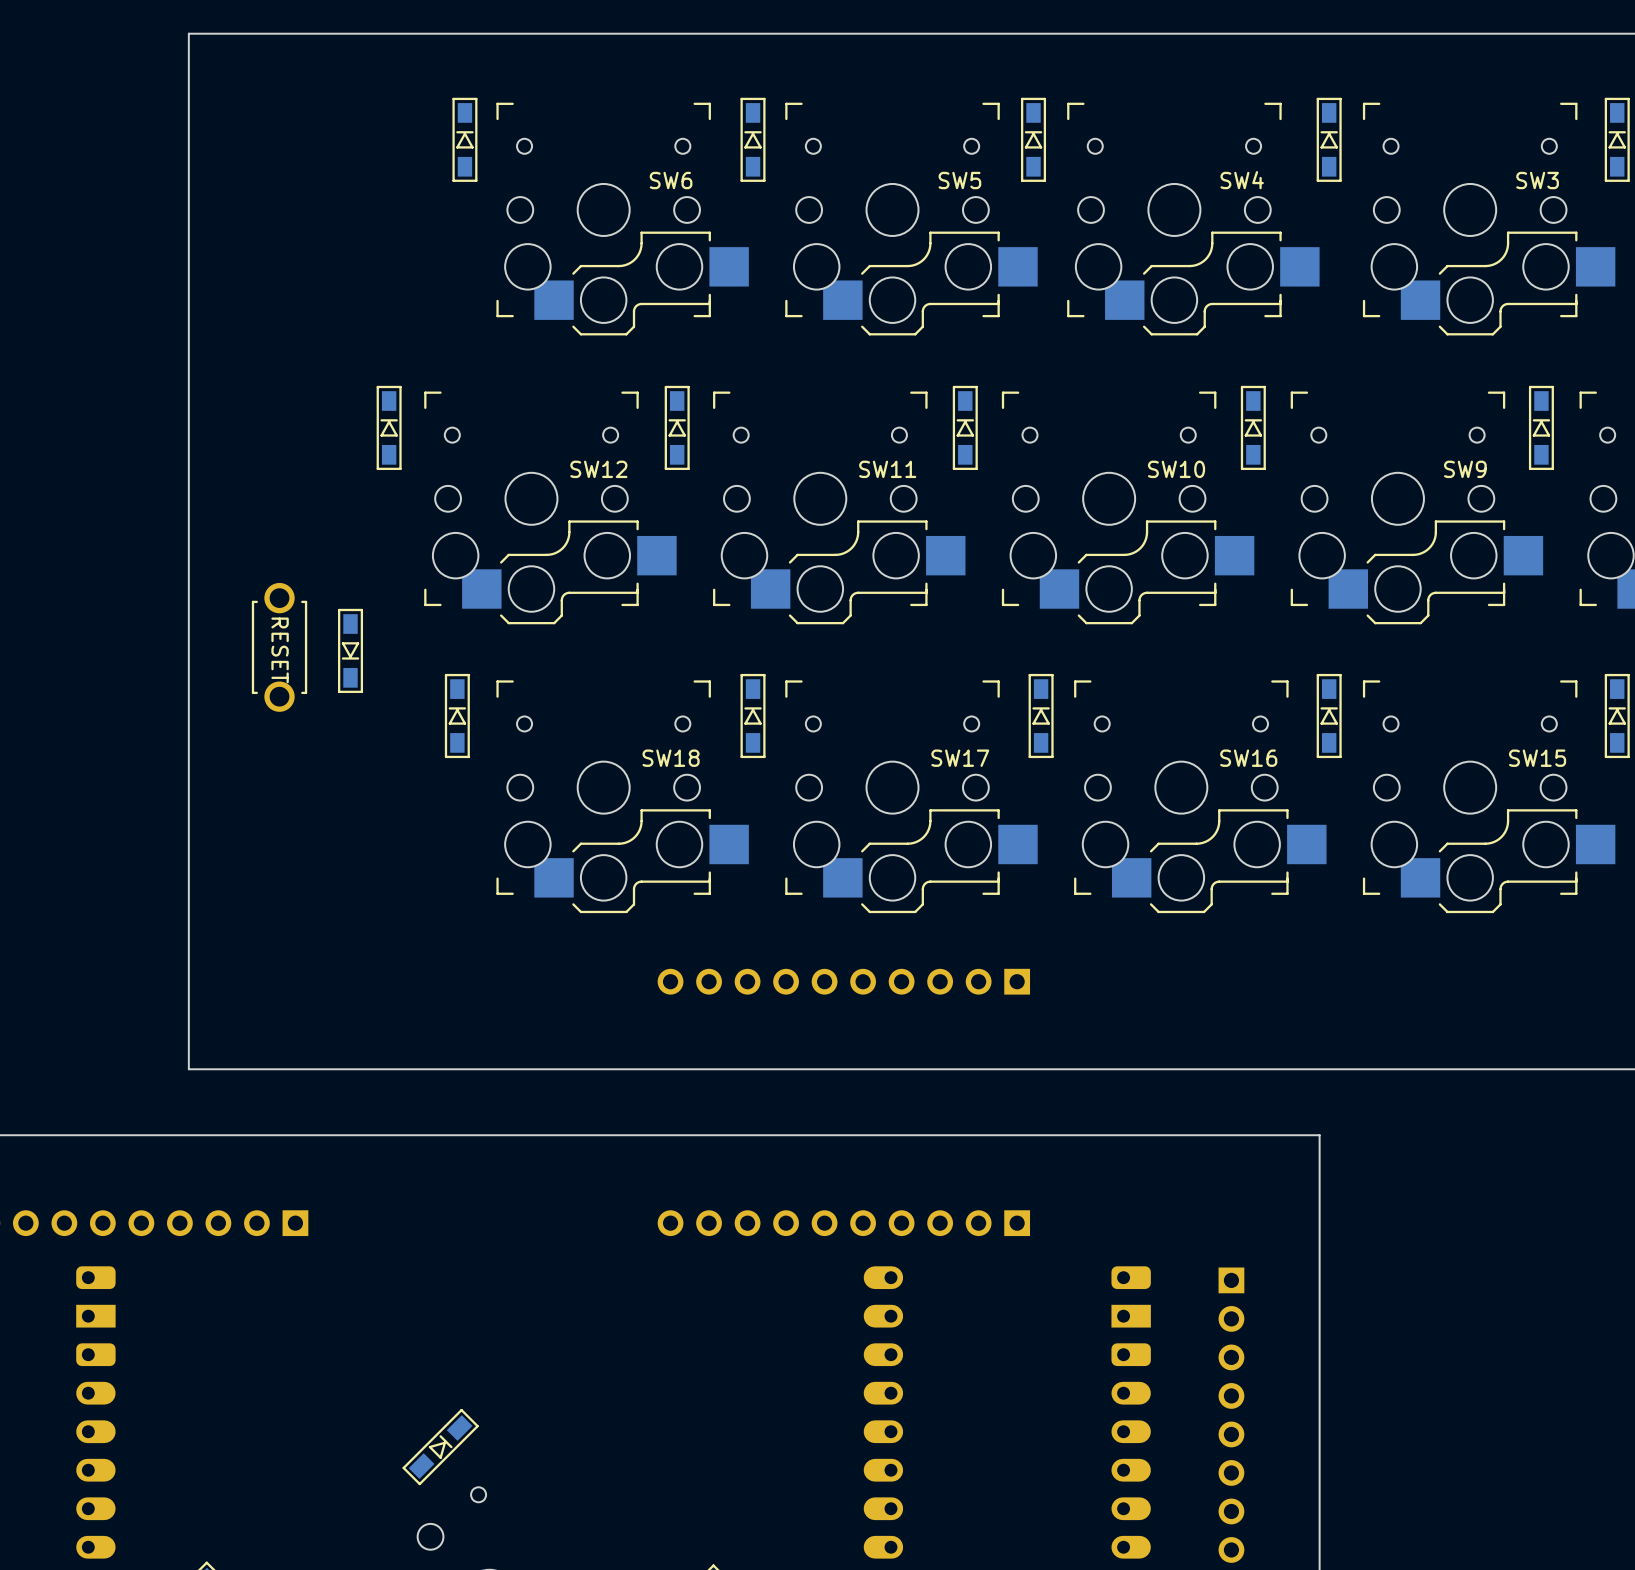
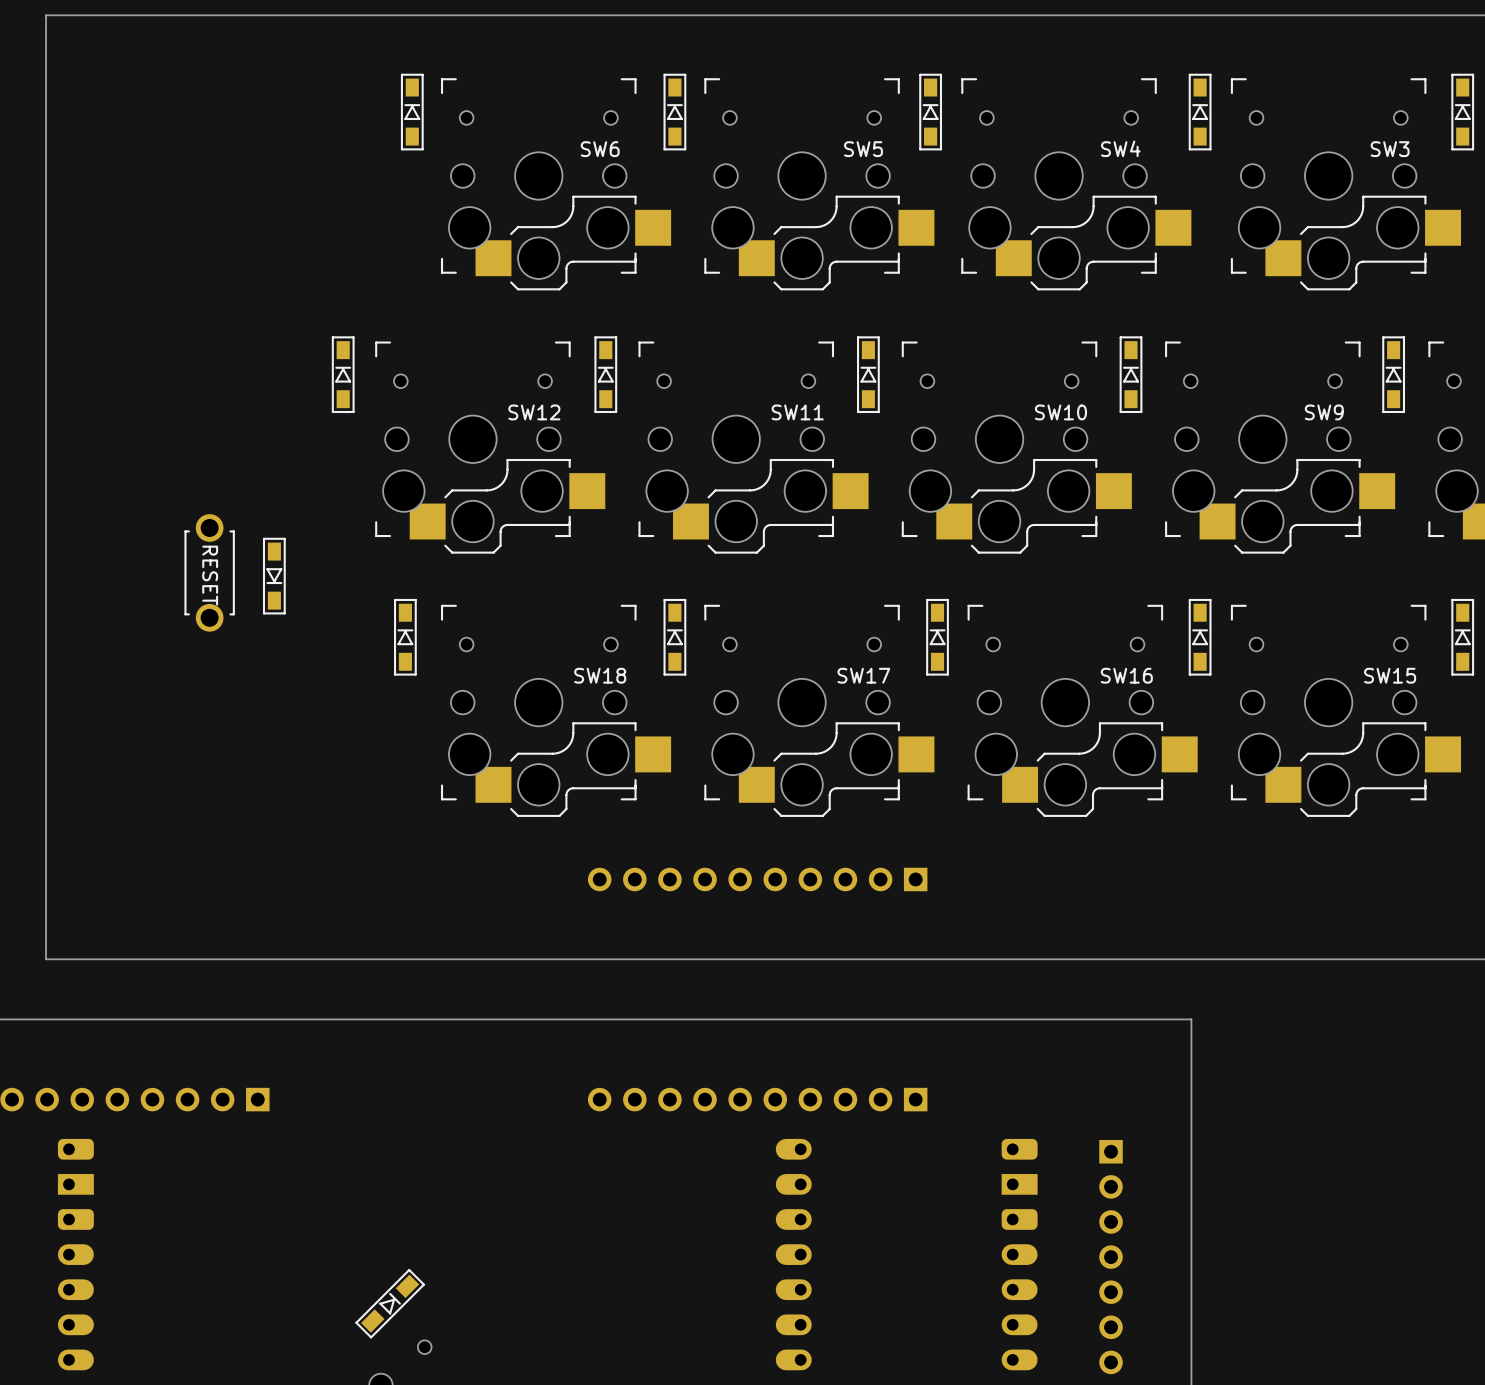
board edge: (188, 33) (188, 1069) -> (160, 15) (46, 15) (46, 959) (160, 959)
part position: (279, 647) -> (209, 572)
part position: (350, 650) -> (274, 576)

